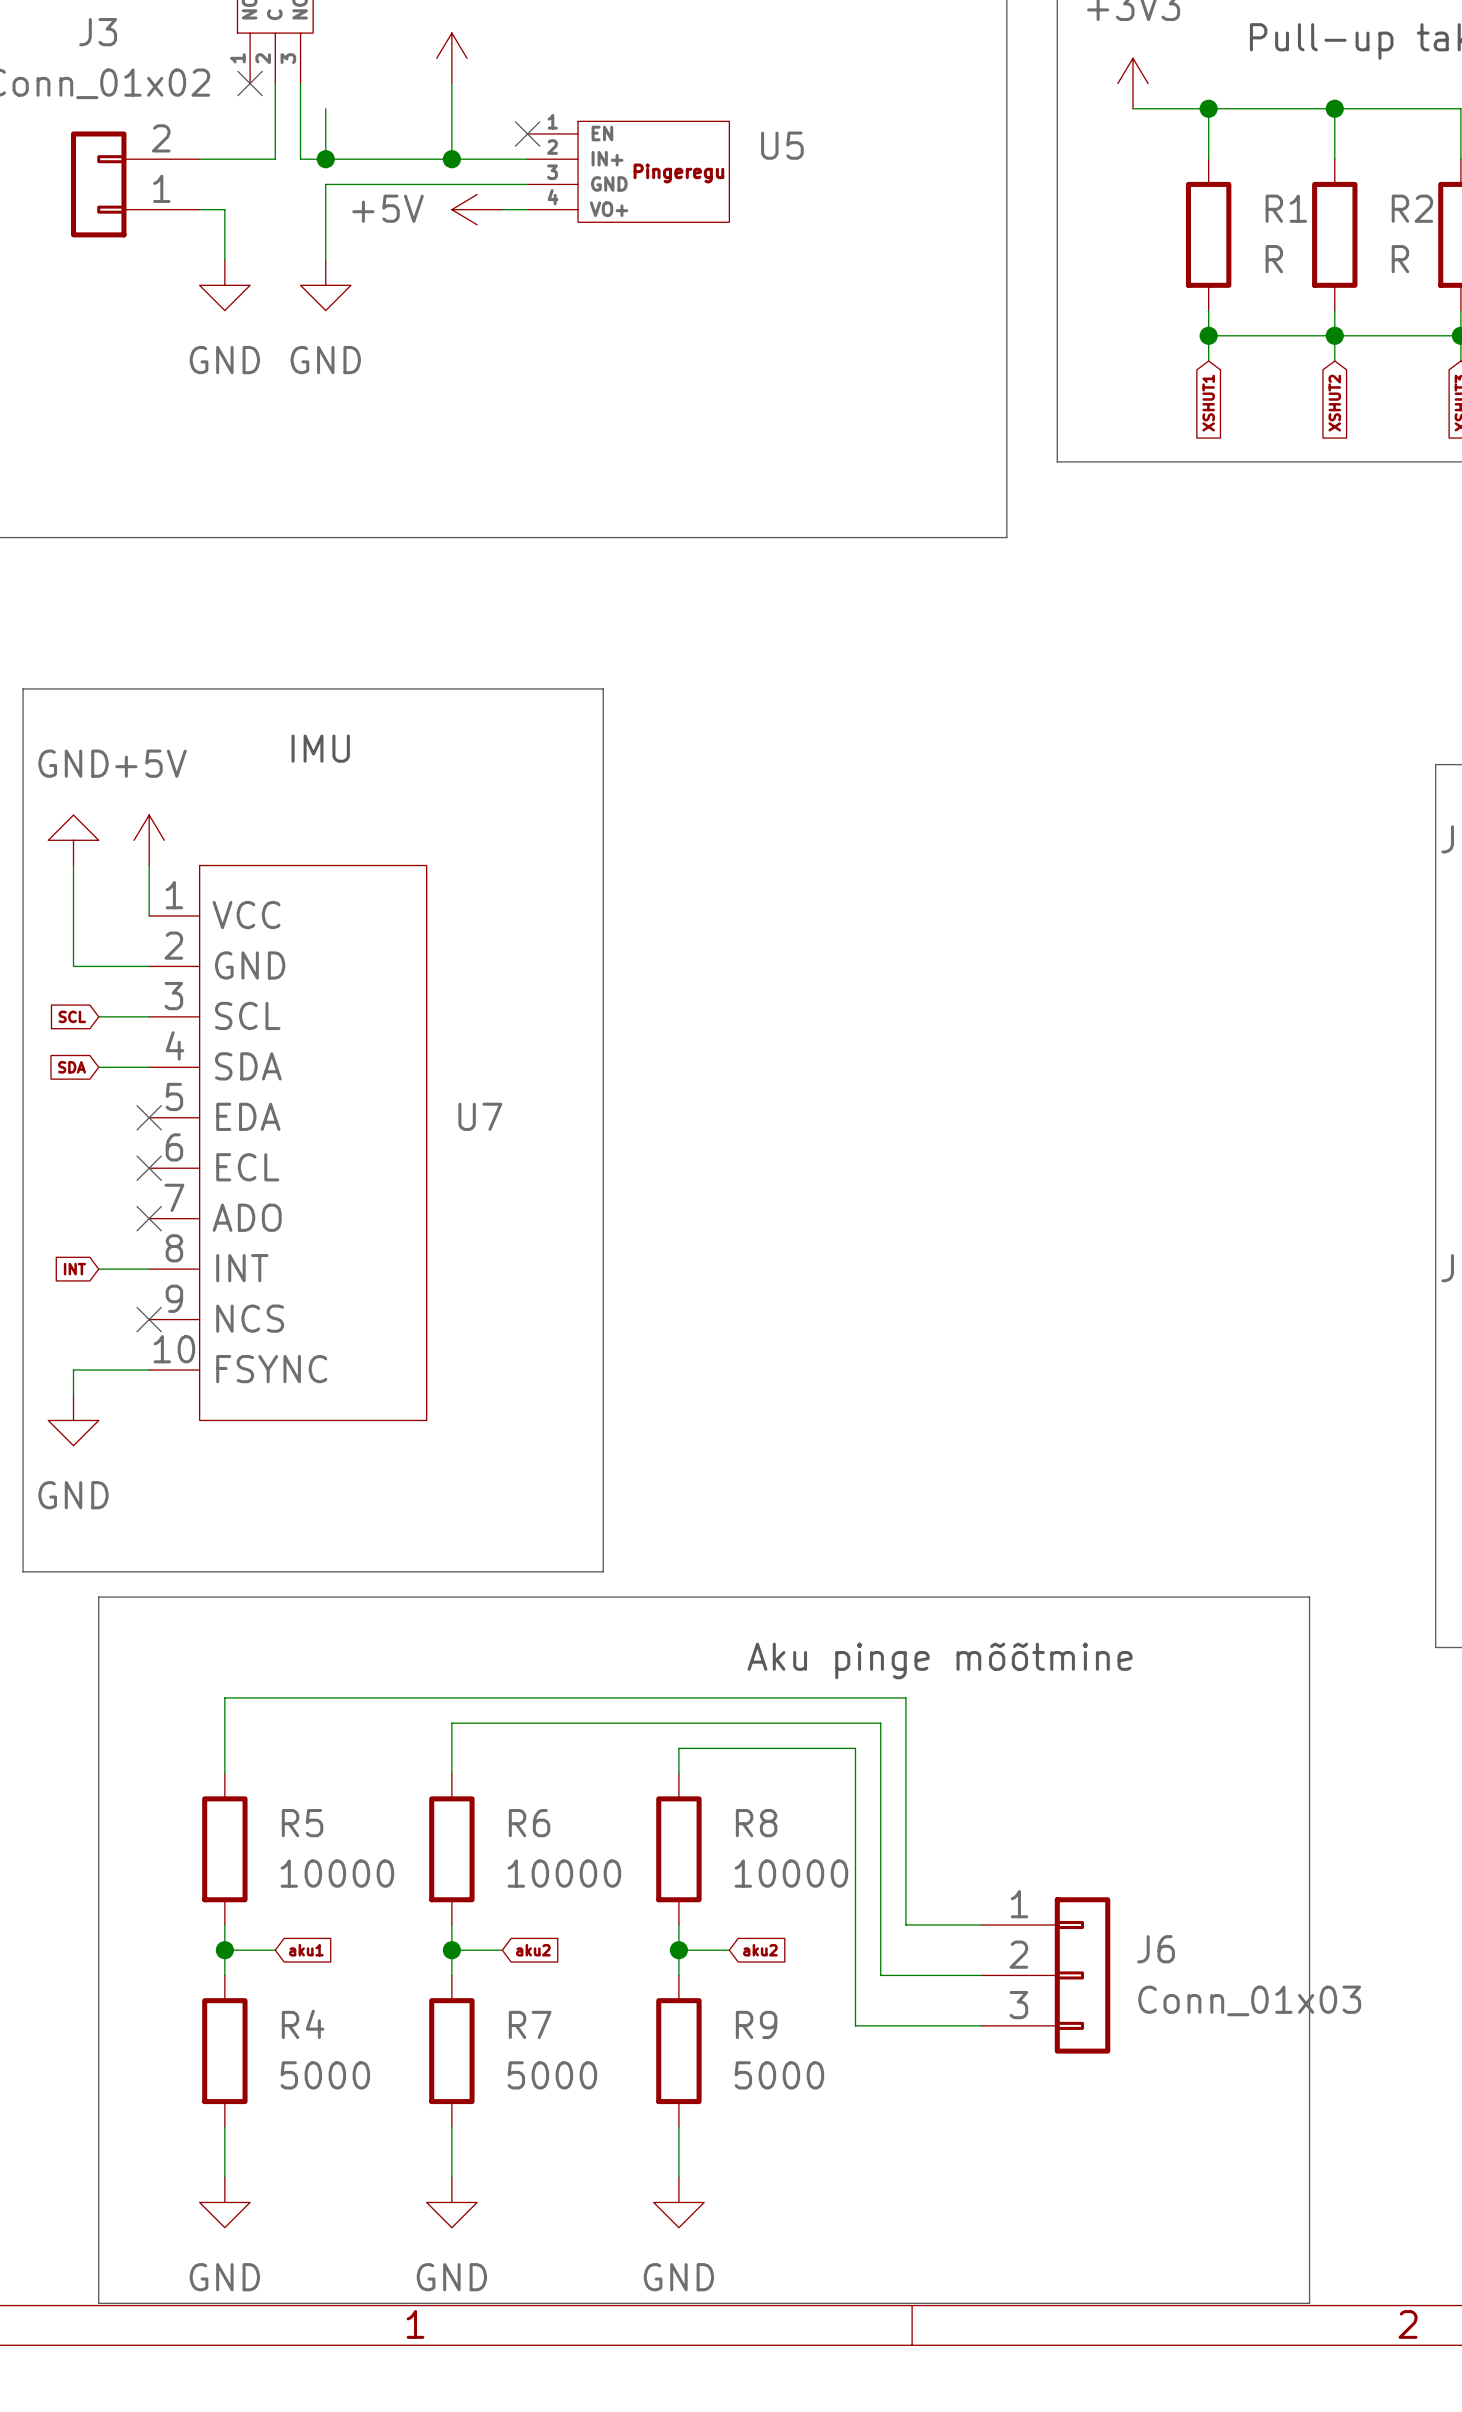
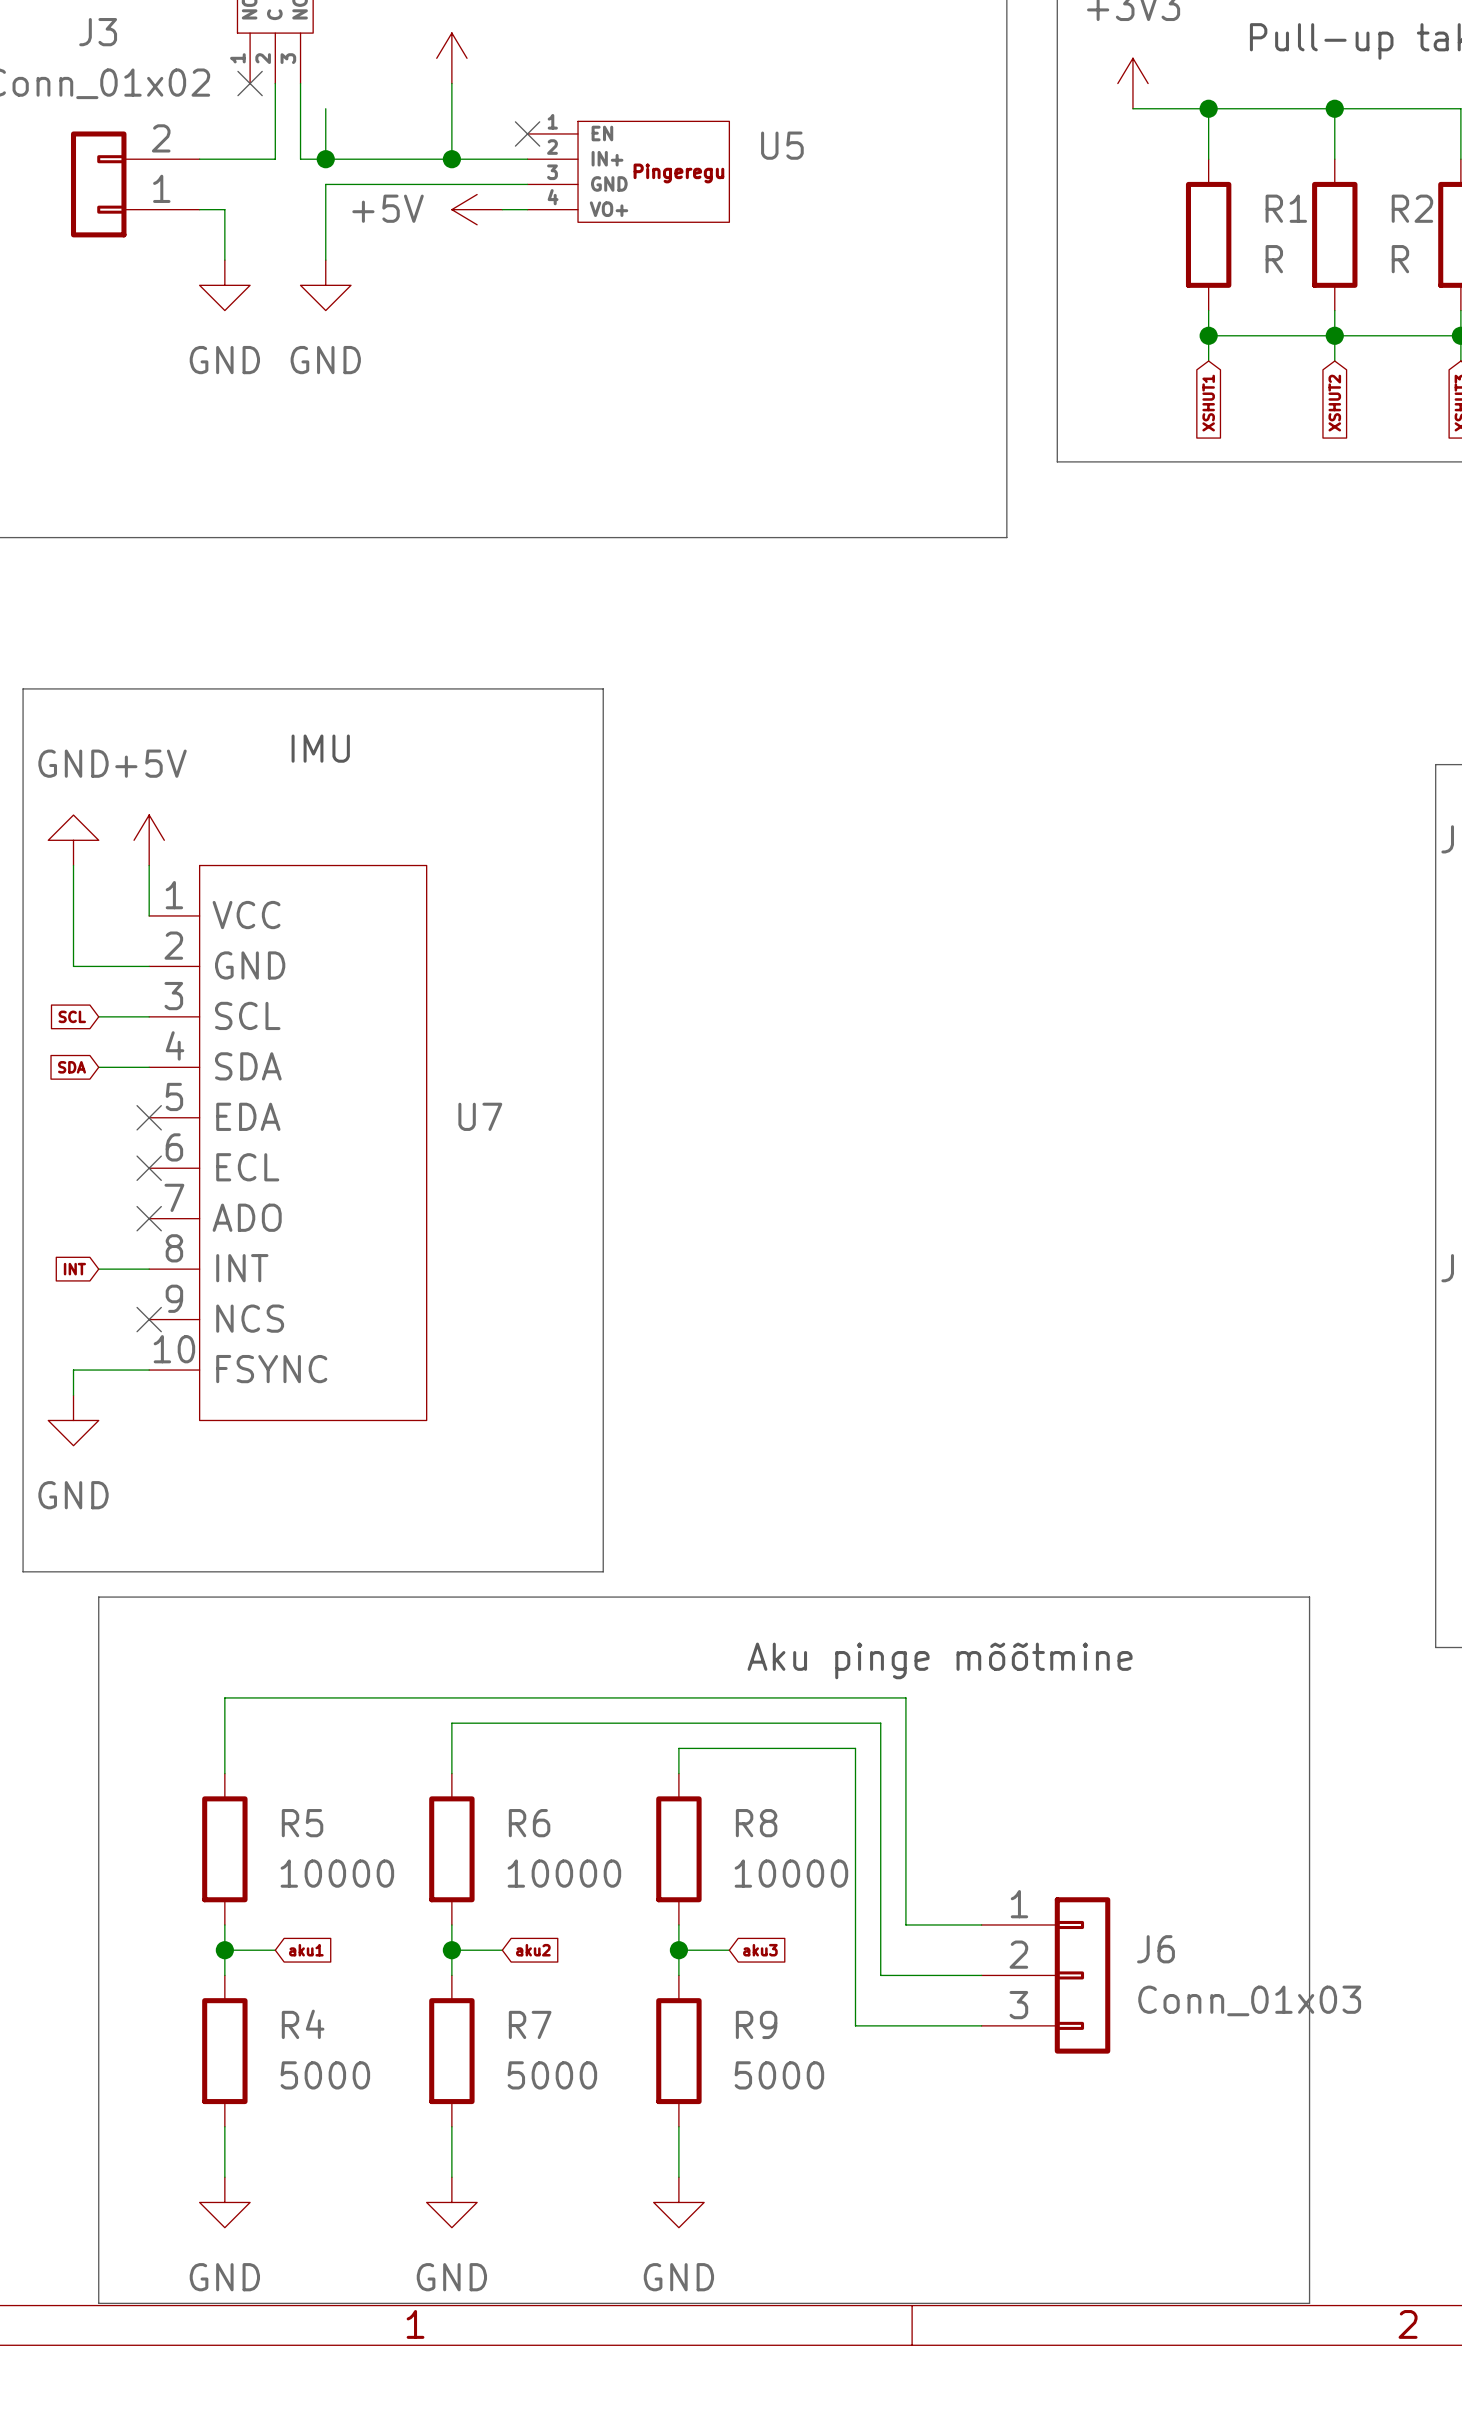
global label: aku2 (760, 1950) -> aku3 (760, 1950)

